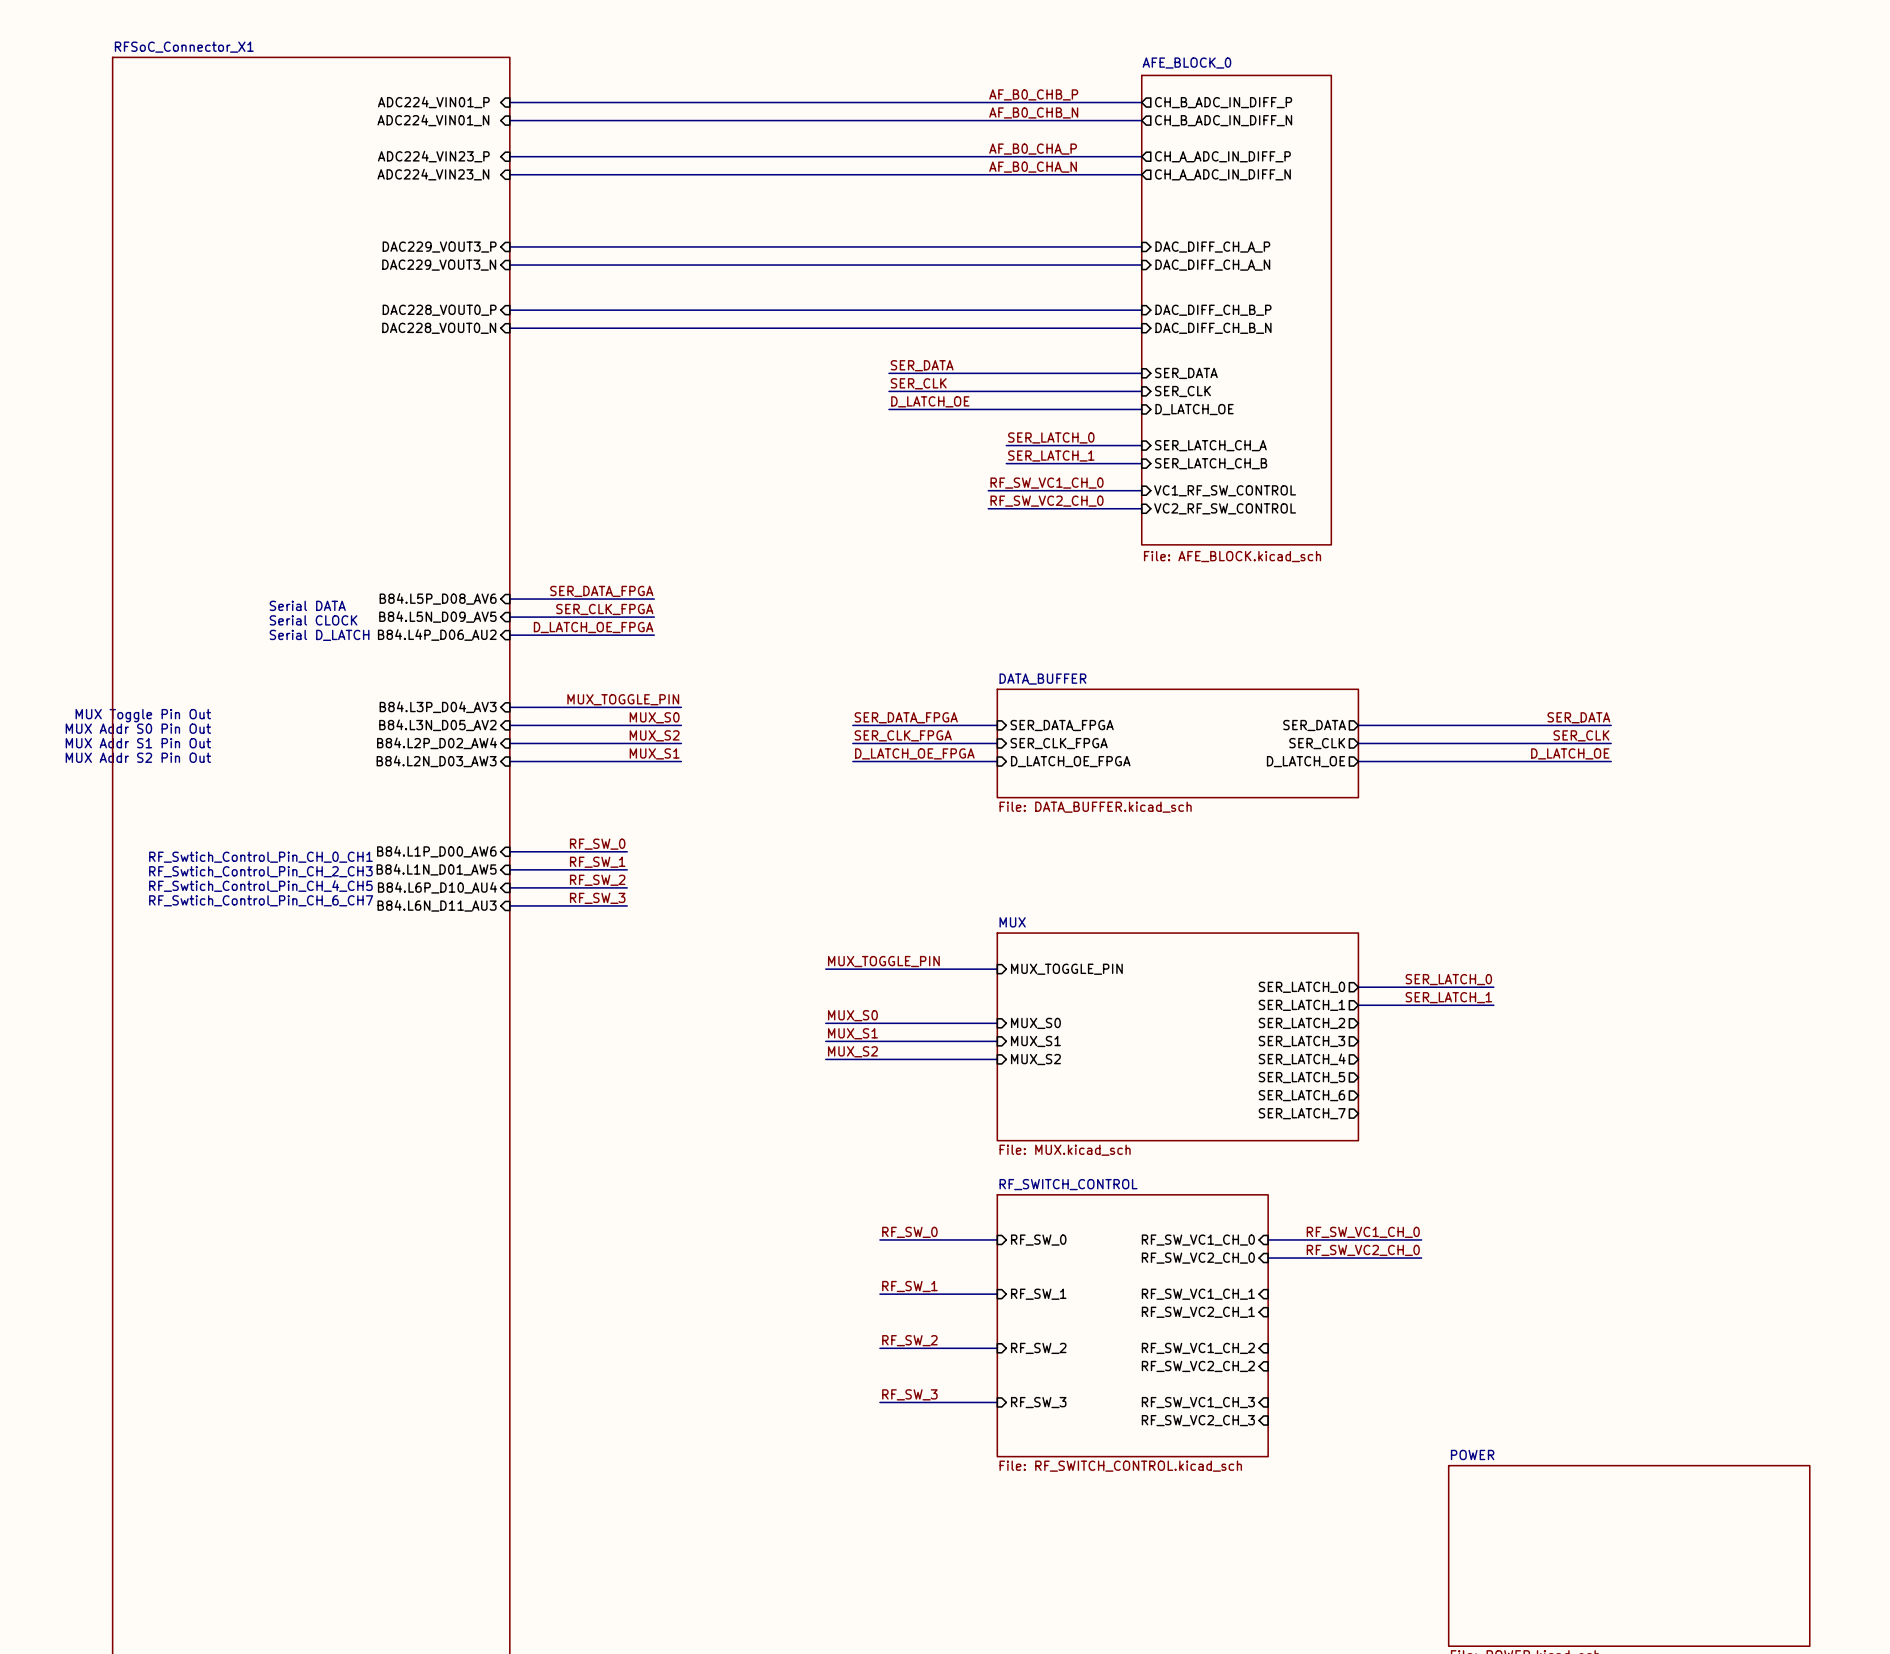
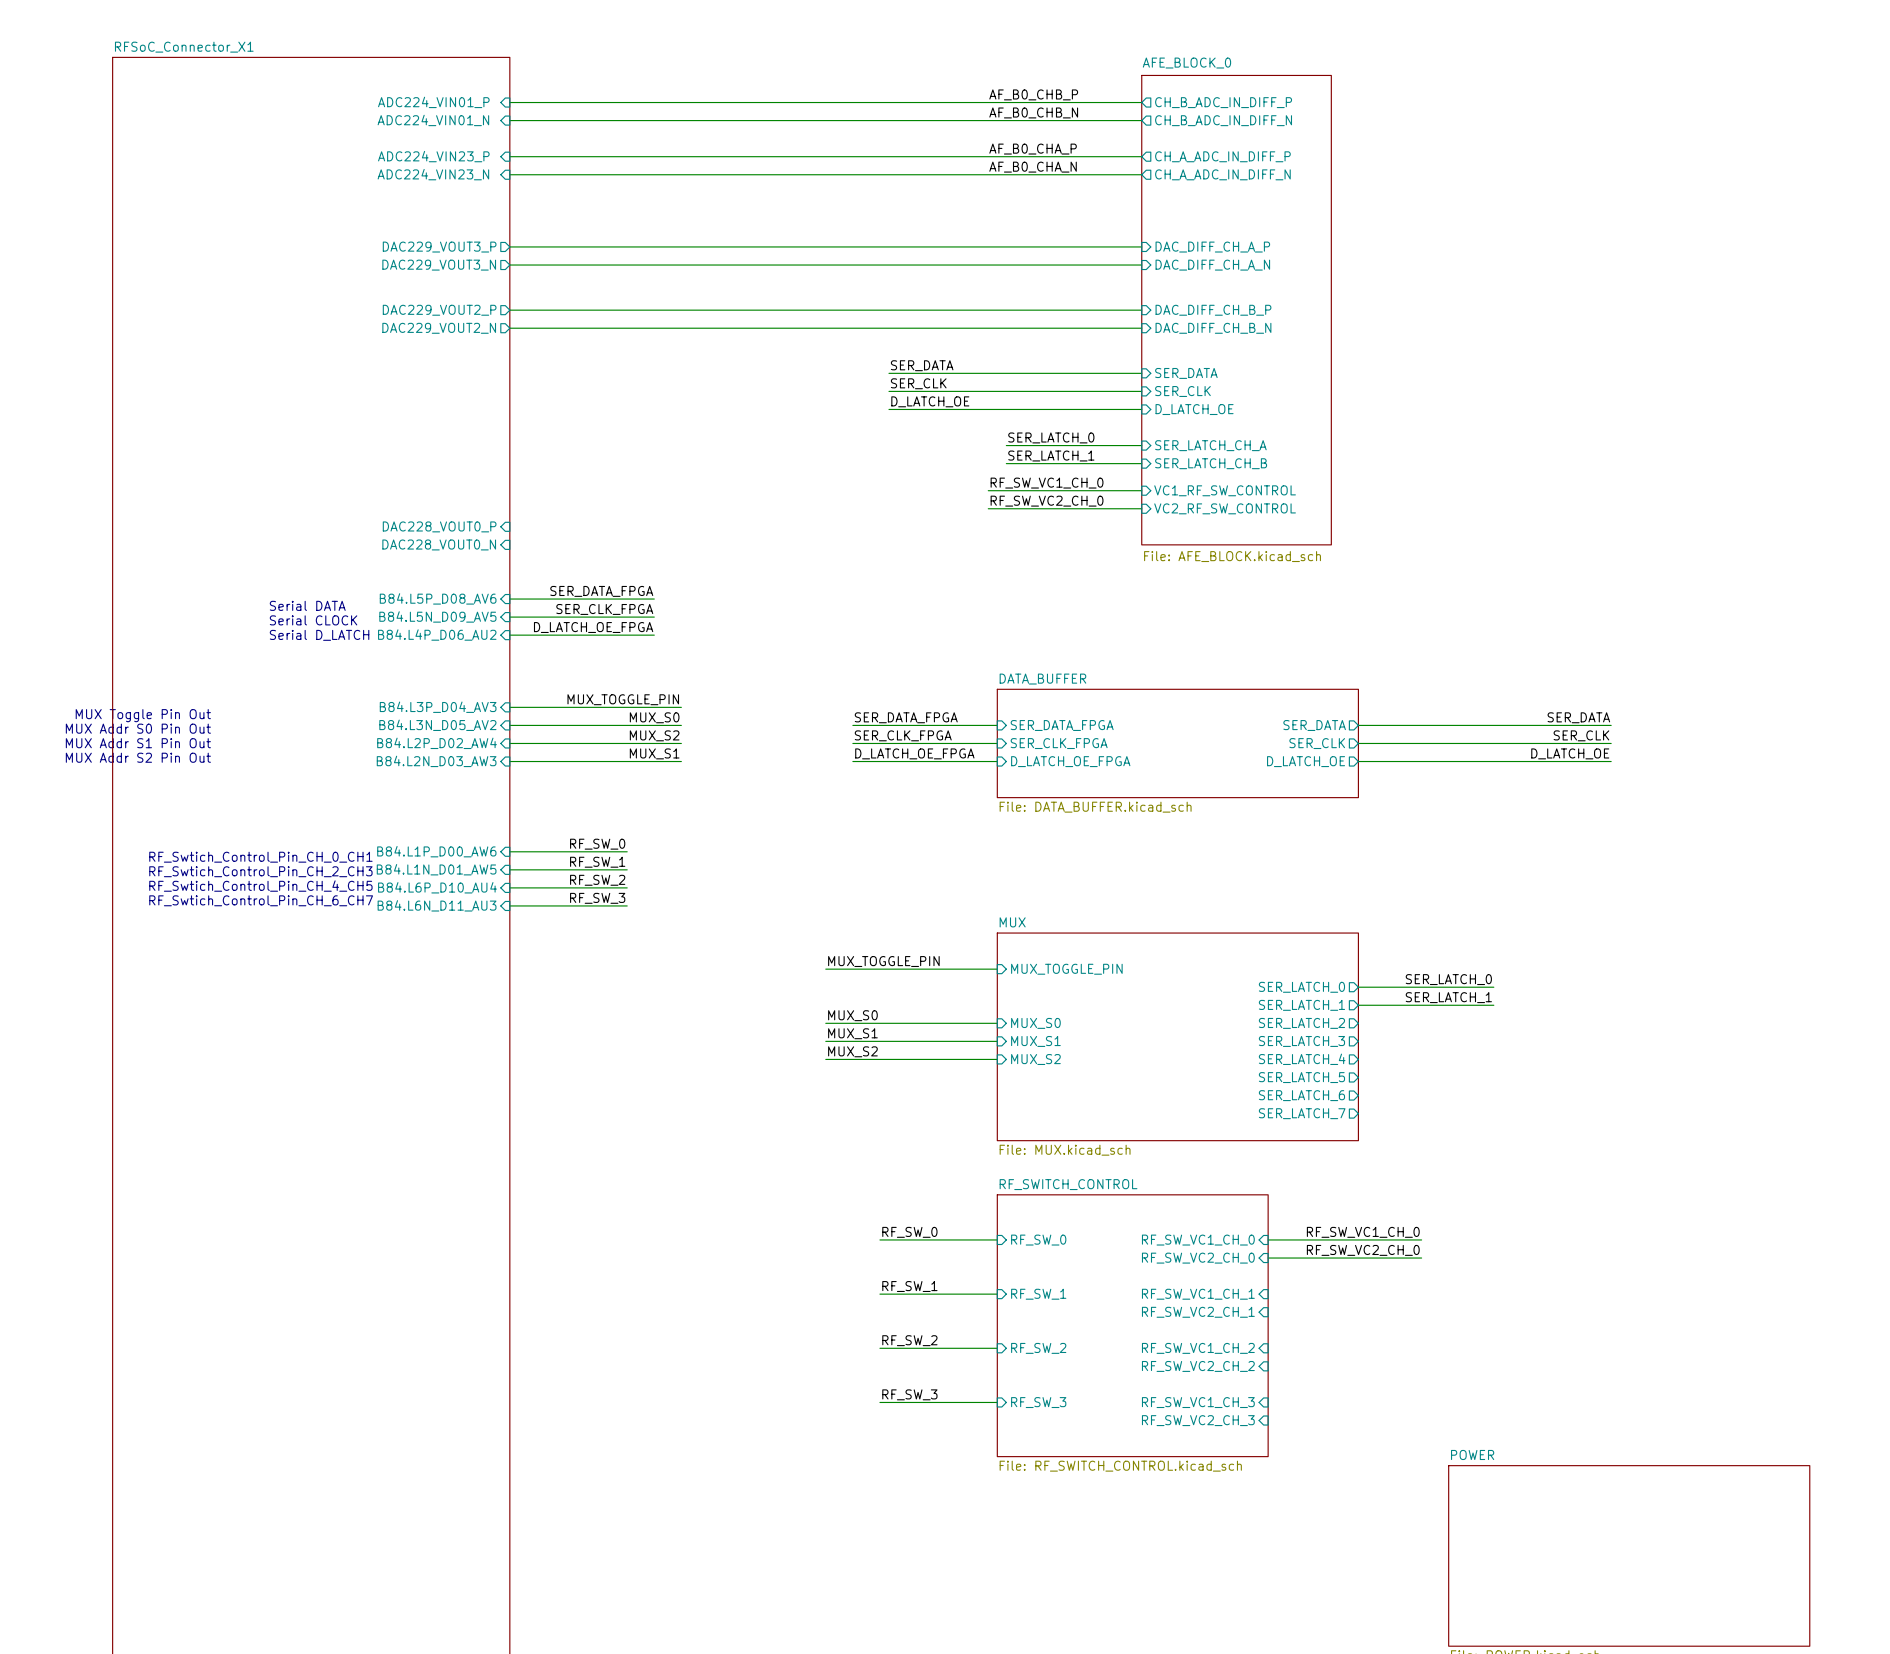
sheet pin shape: input (439, 247) -> output (439, 247)
sheet pin shape: input (439, 265) -> output (439, 265)
sheet pin shape: input (439, 310) -> output (439, 310)
sheet pin: DAC228_VOUT0_P (439, 310) -> DAC229_VOUT2_P (439, 310)
sheet pin shape: input (439, 328) -> output (439, 328)
sheet pin: DAC228_VOUT0_N (439, 328) -> DAC229_VOUT2_N (439, 328)
sheet pin: none -> DAC228_VOUT0_P (439, 526)
sheet pin: none -> DAC228_VOUT0_N (439, 544)

